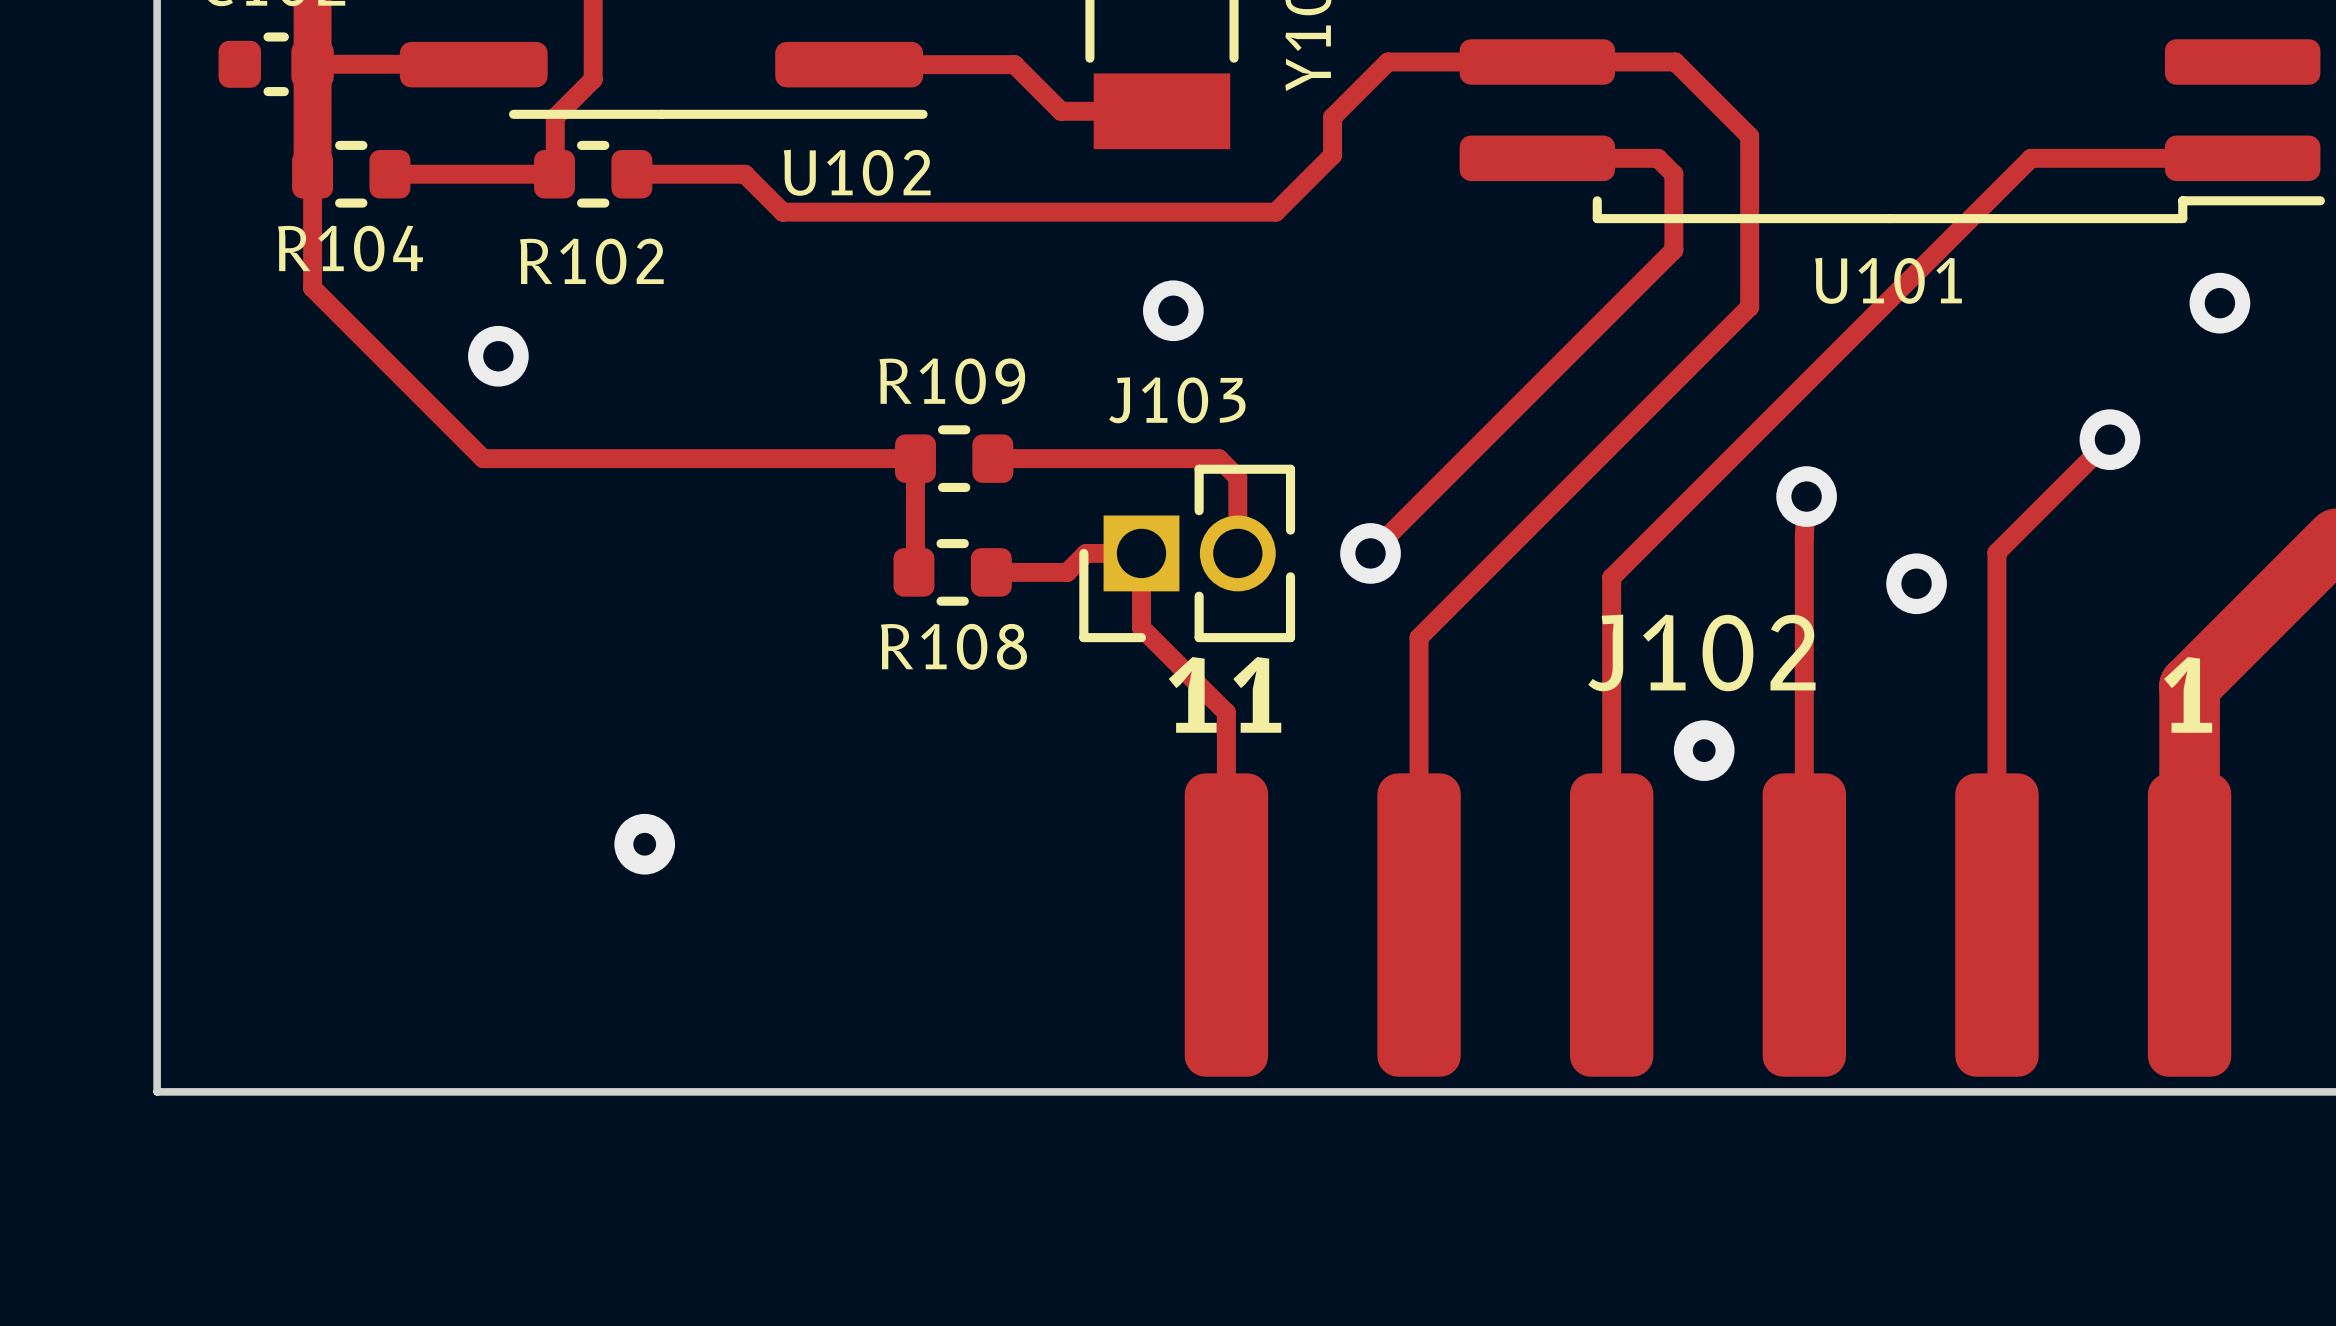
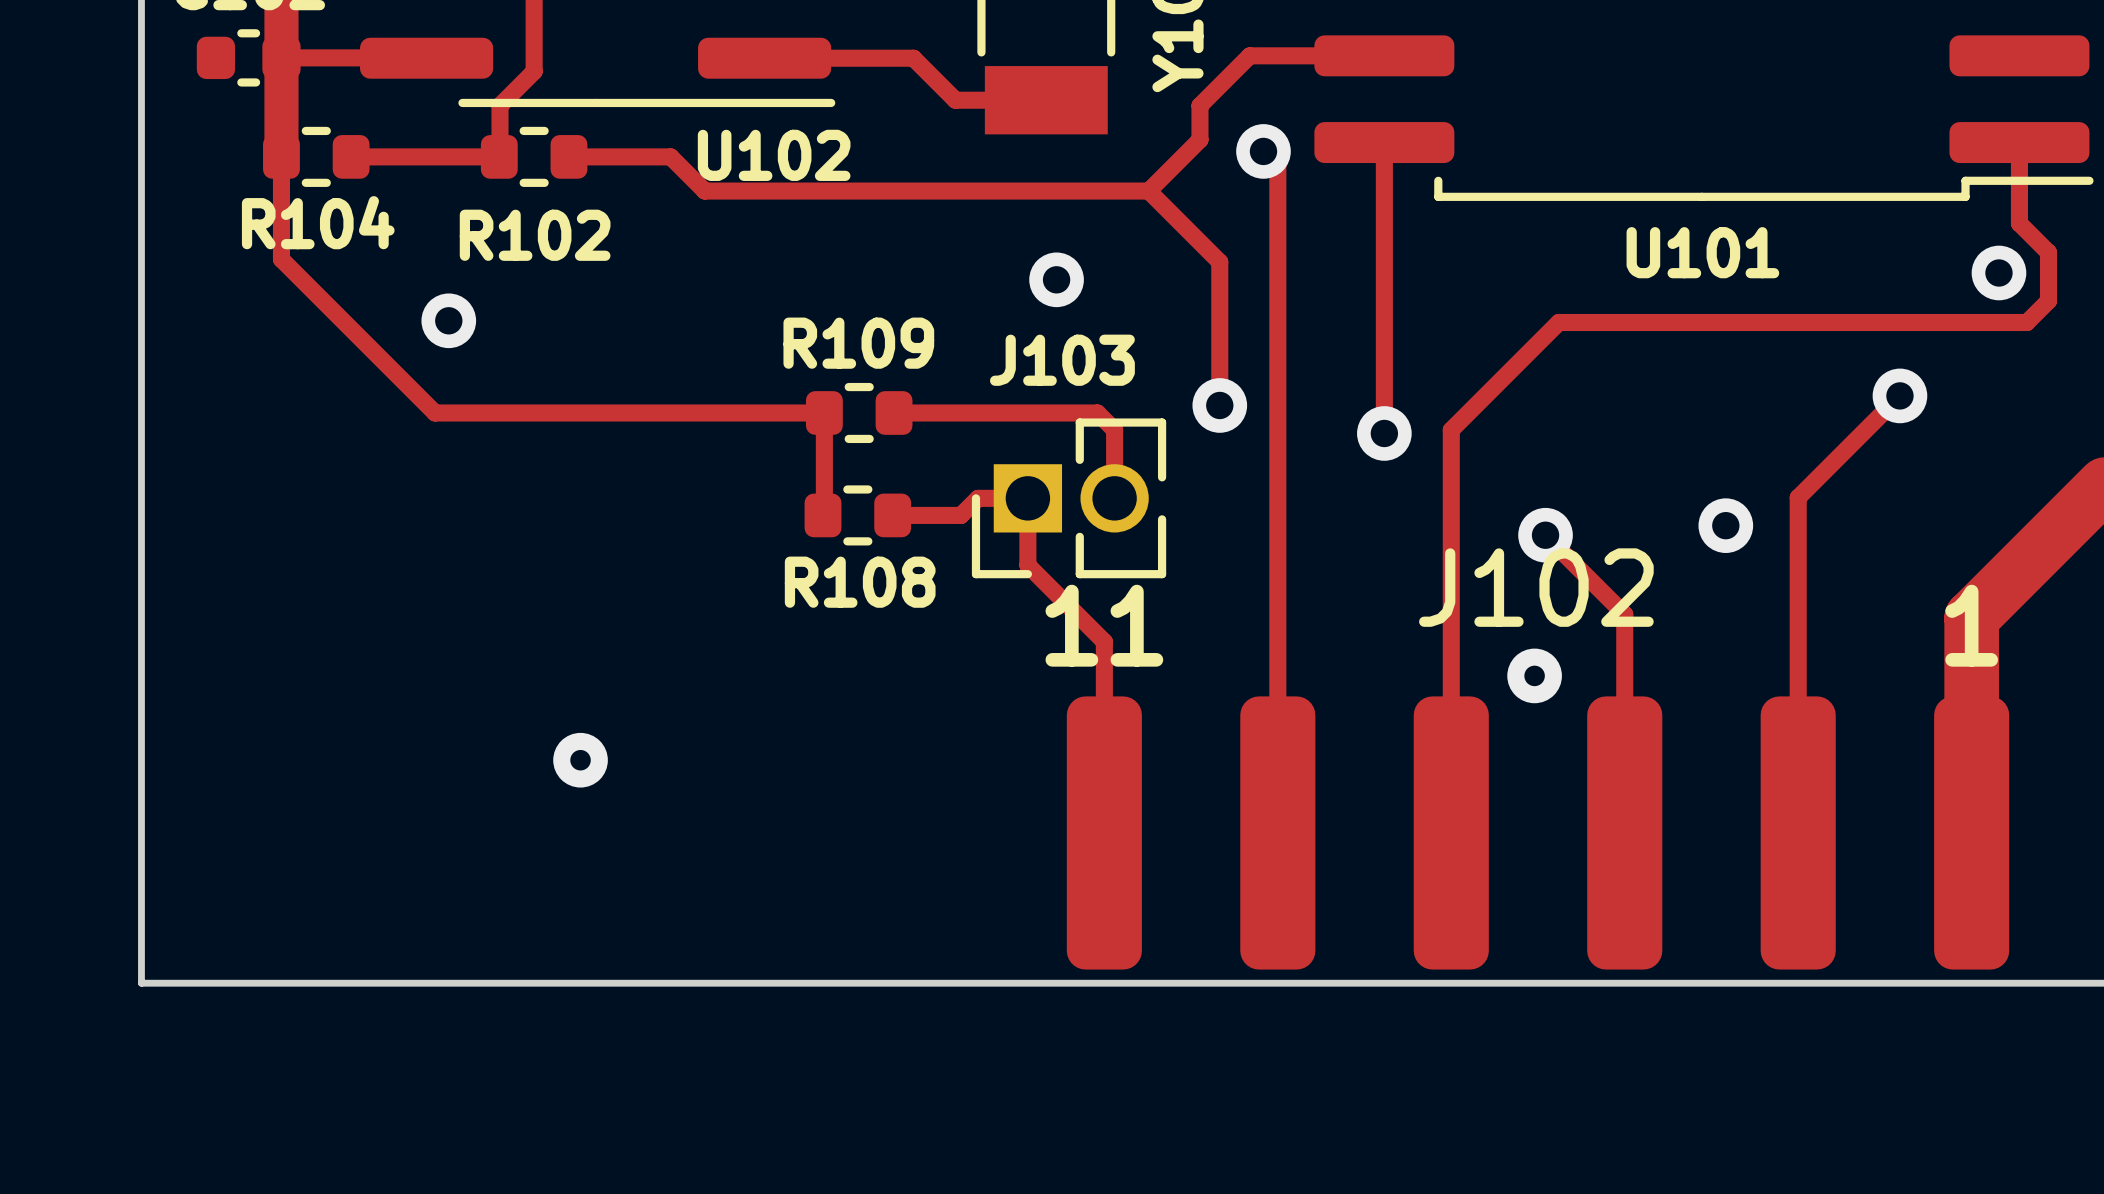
track: (1537, 62) (1675, 62) (1749, 136) (1749, 306) (1419, 637) -> (1263, 151) (1277, 165) (1277, 574)
track: (1537, 158) (1657, 158) (1673, 174) (1673, 250) (1370, 553) -> (1384, 142) (1384, 433)
track: (2242, 158) (2031, 158) (1611, 577) -> (2019, 142) (2019, 223) (2048, 252) (2048, 300) (2026, 322) (1558, 322) (1451, 430) (1451, 520)
via: none -> (1263, 151)
track: none -> (1148, 191) (1219, 262) (1219, 405)
via: none -> (1219, 405)
via: none -> (1384, 433)
track: (1806, 496) (1804, 536) (1804, 682) -> (1545, 535) (1624, 614)
via position: (1806, 496) -> (1545, 535)
via: (1370, 553) -> none

